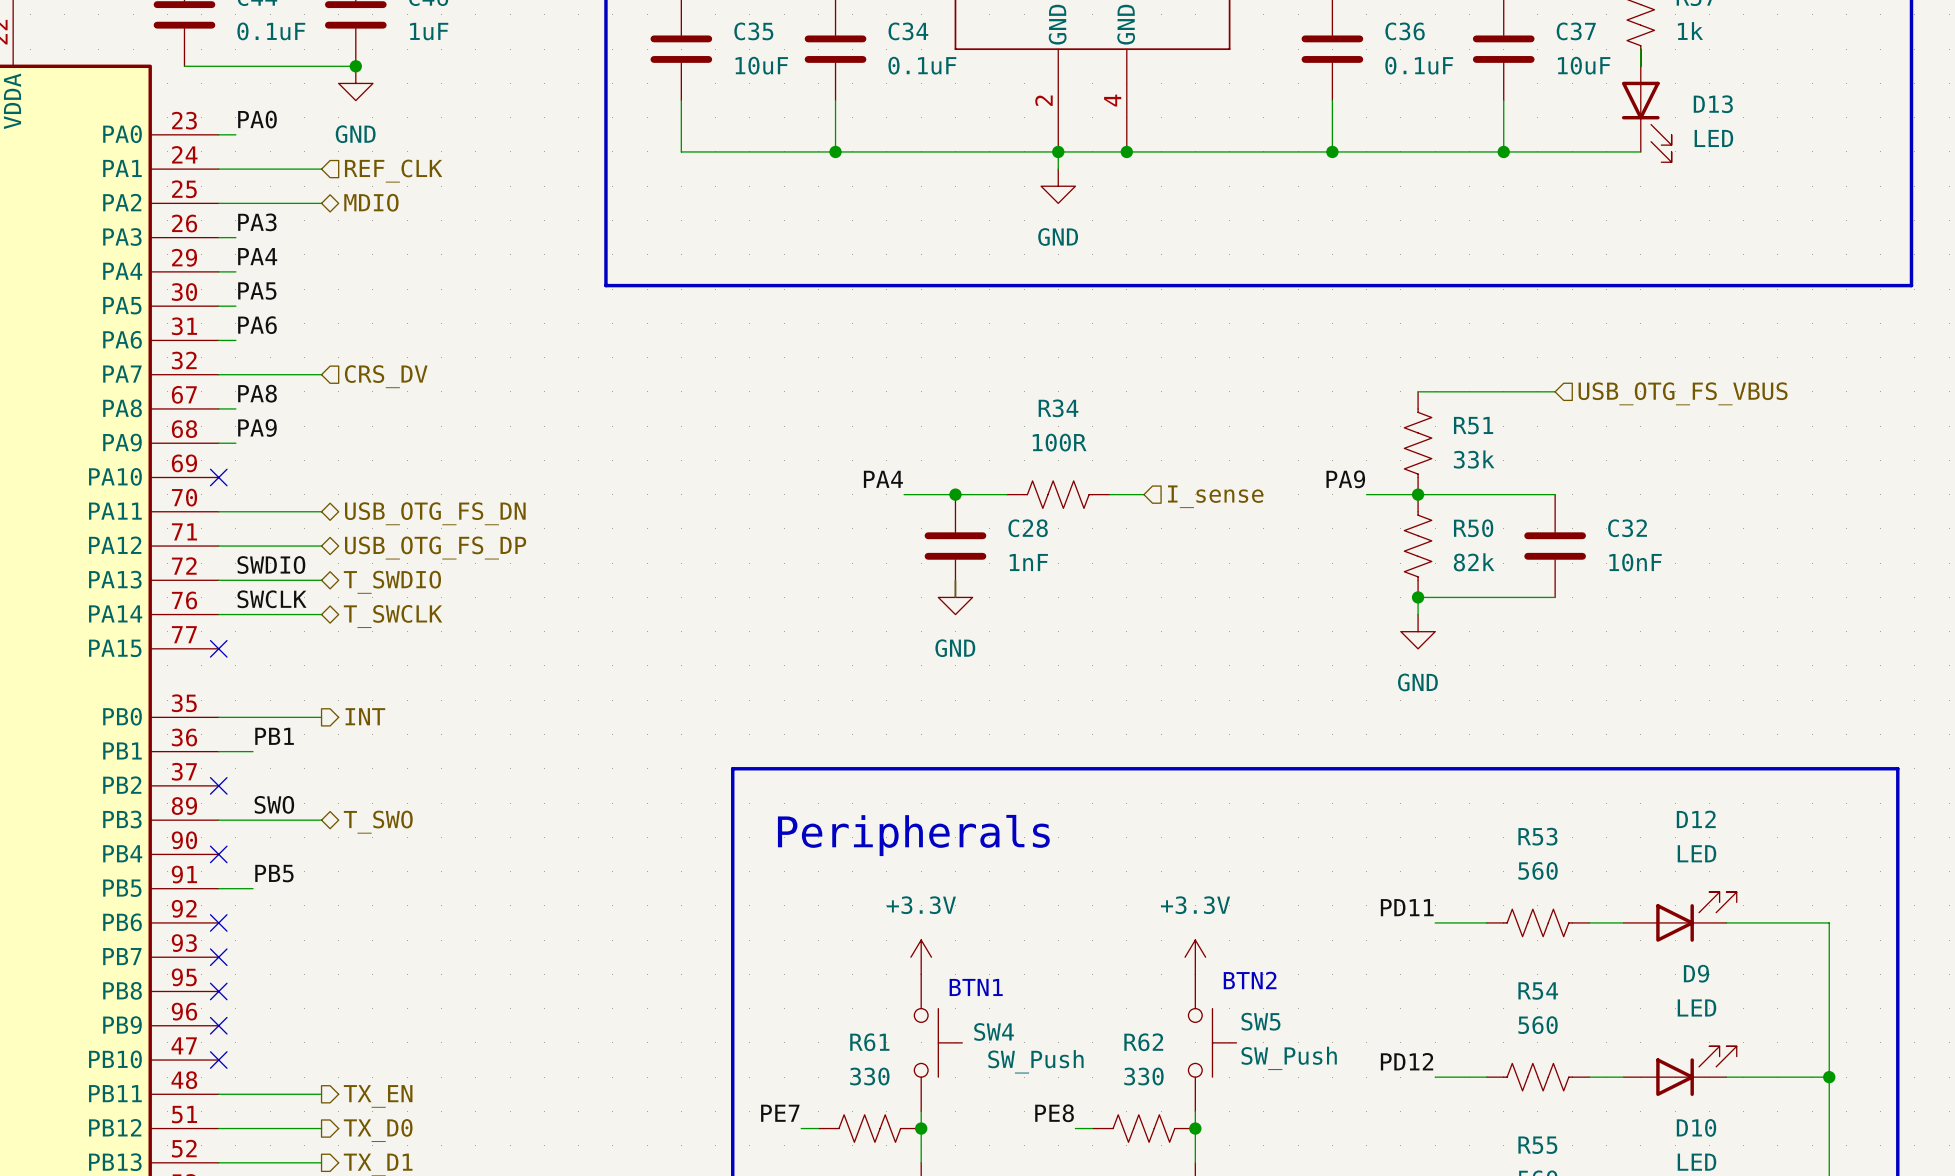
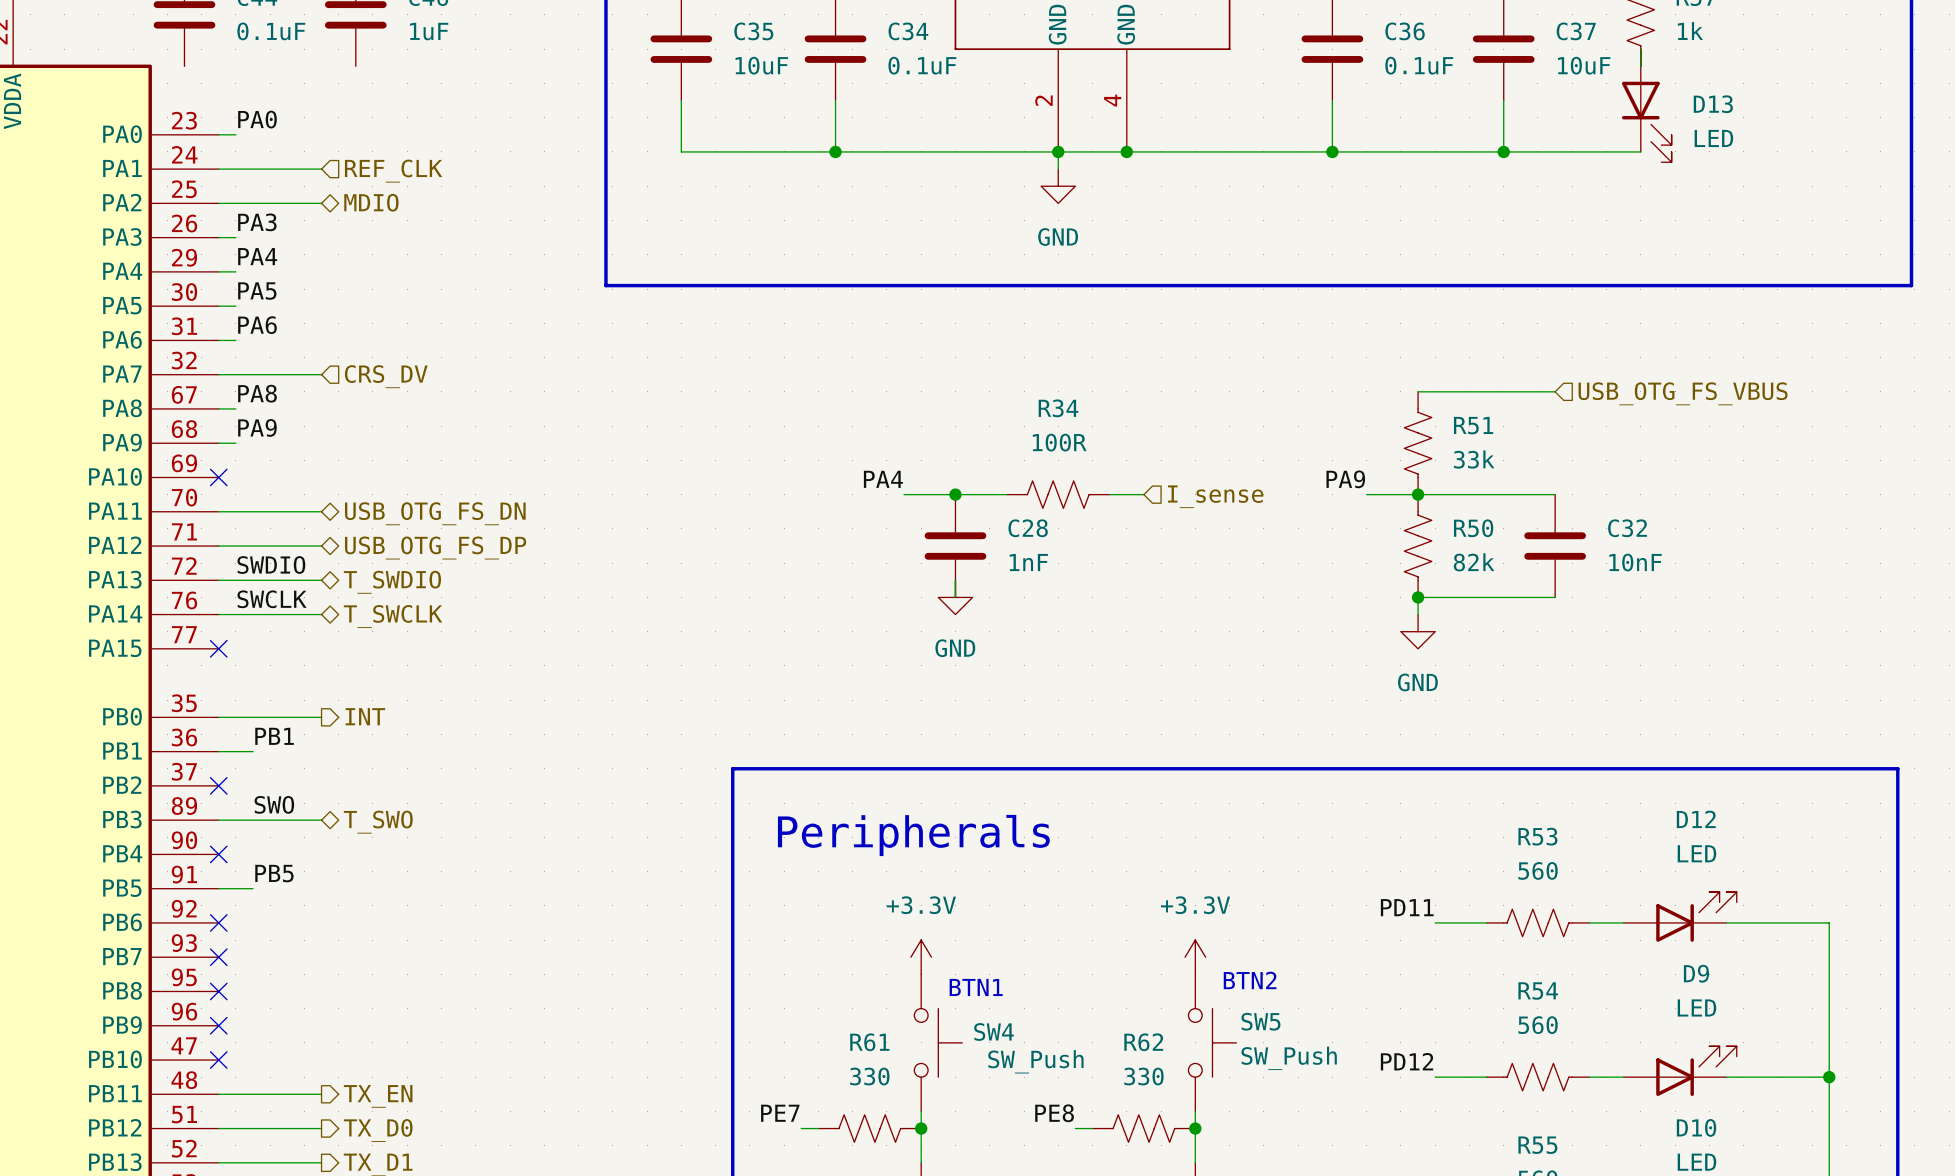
wire: (184, 66) (355, 66) -> none
junction: (355, 66) -> none
power symbol: GND (355, 83) -> none

